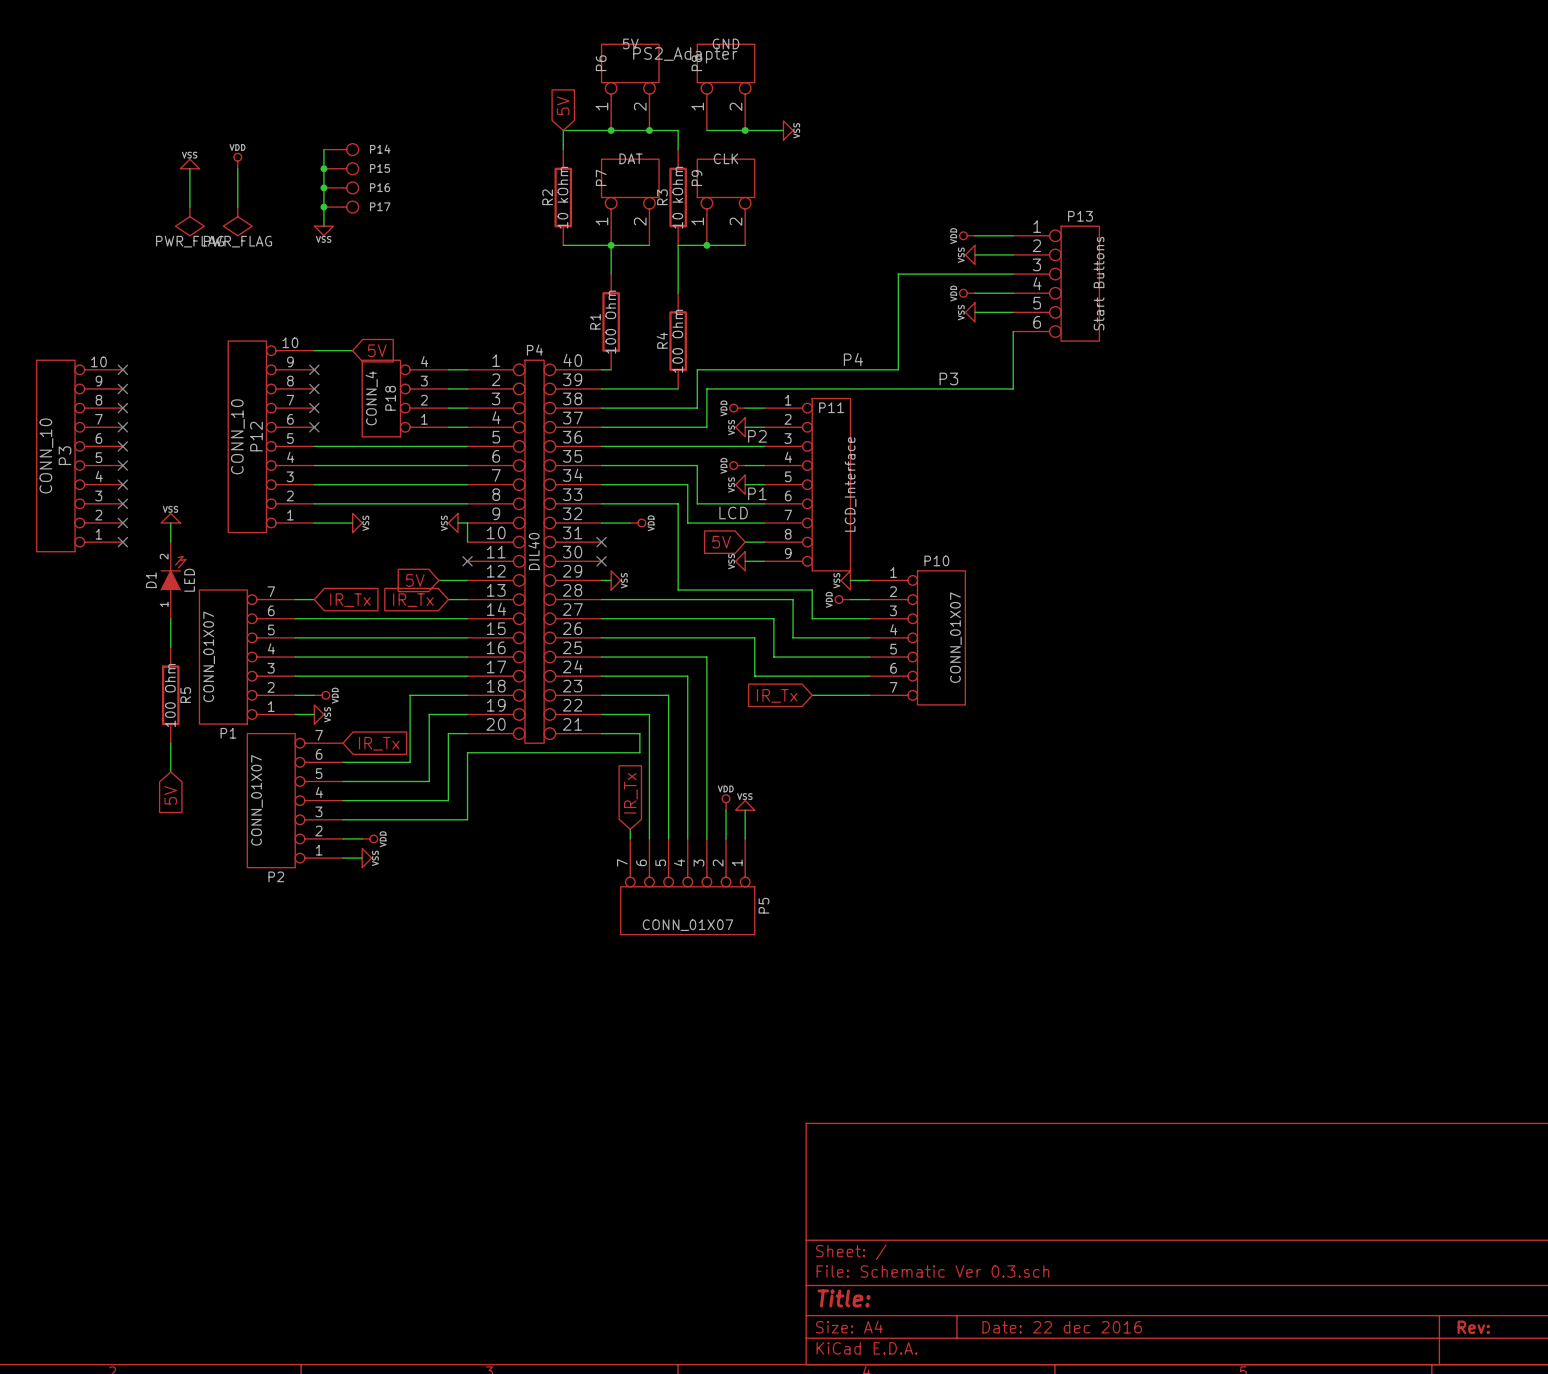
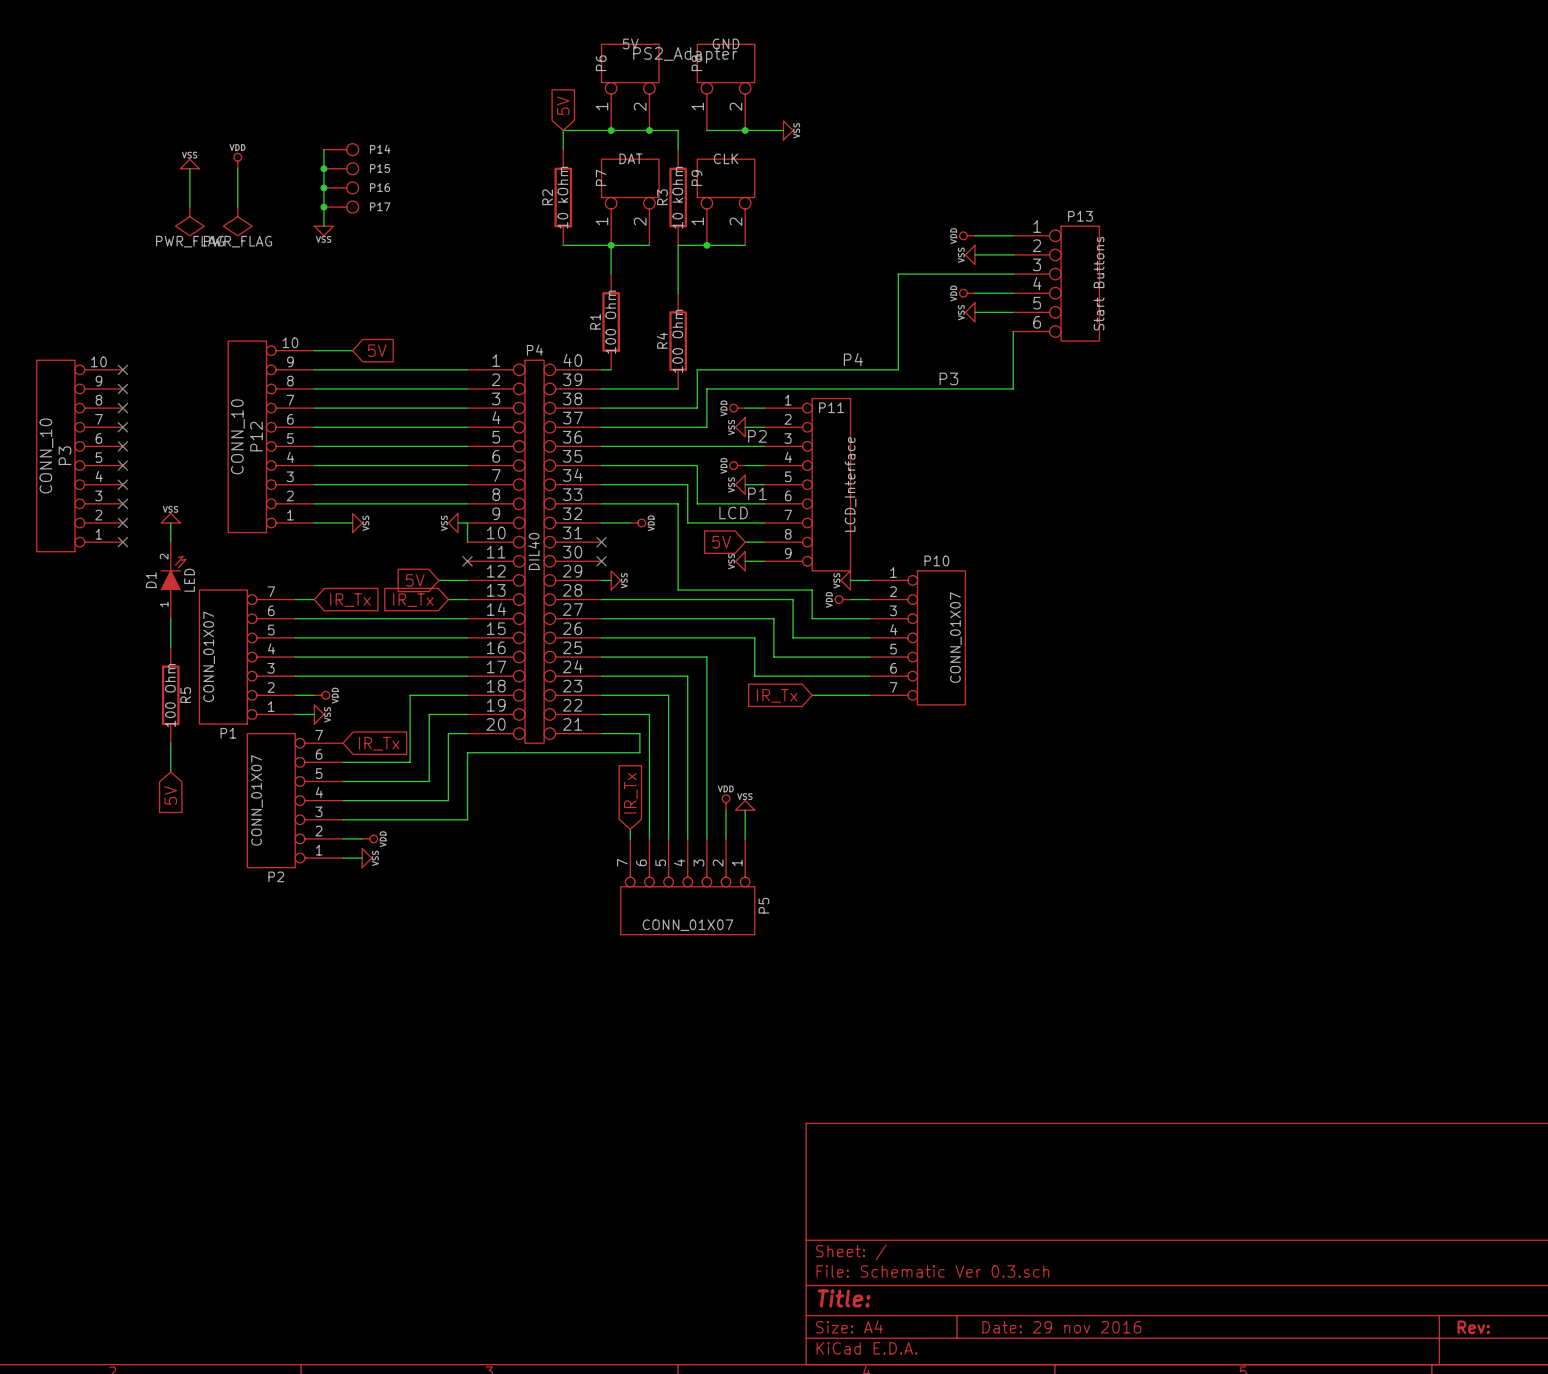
wire: none -> (314, 369) (448, 369)
no-connect mark: (314, 369) -> none
wire: none -> (314, 388) (448, 388)
no-connect mark: (314, 388) -> none
P18: CONN_4 (405, 398) -> none
wire: none -> (314, 408) (448, 408)
no-connect mark: (314, 408) -> none
wire: none -> (314, 427) (448, 427)
no-connect mark: (314, 427) -> none
title block: Date: 22 dec 2016 (1062, 1327) -> Date: 29 nov 2016 (1061, 1327)

